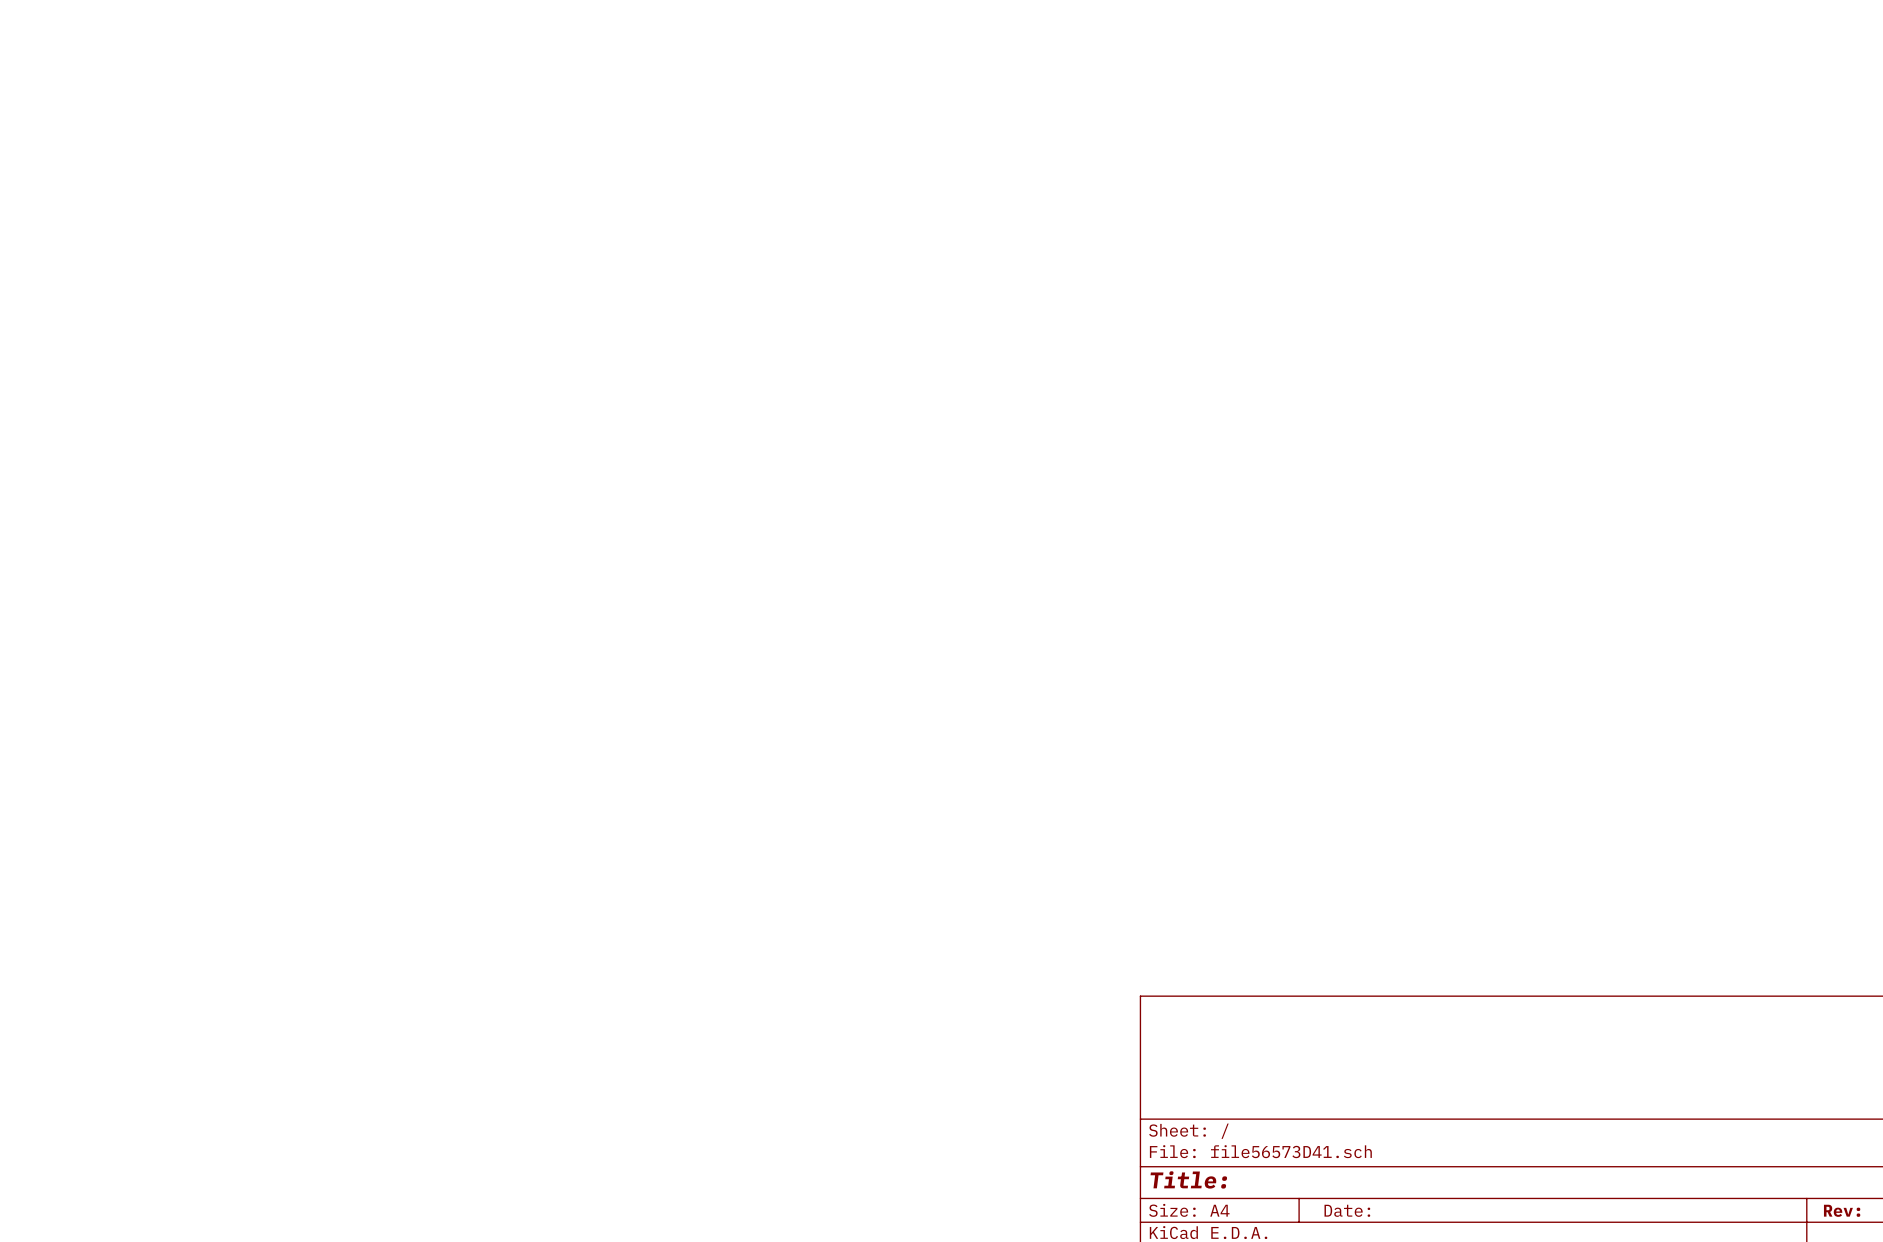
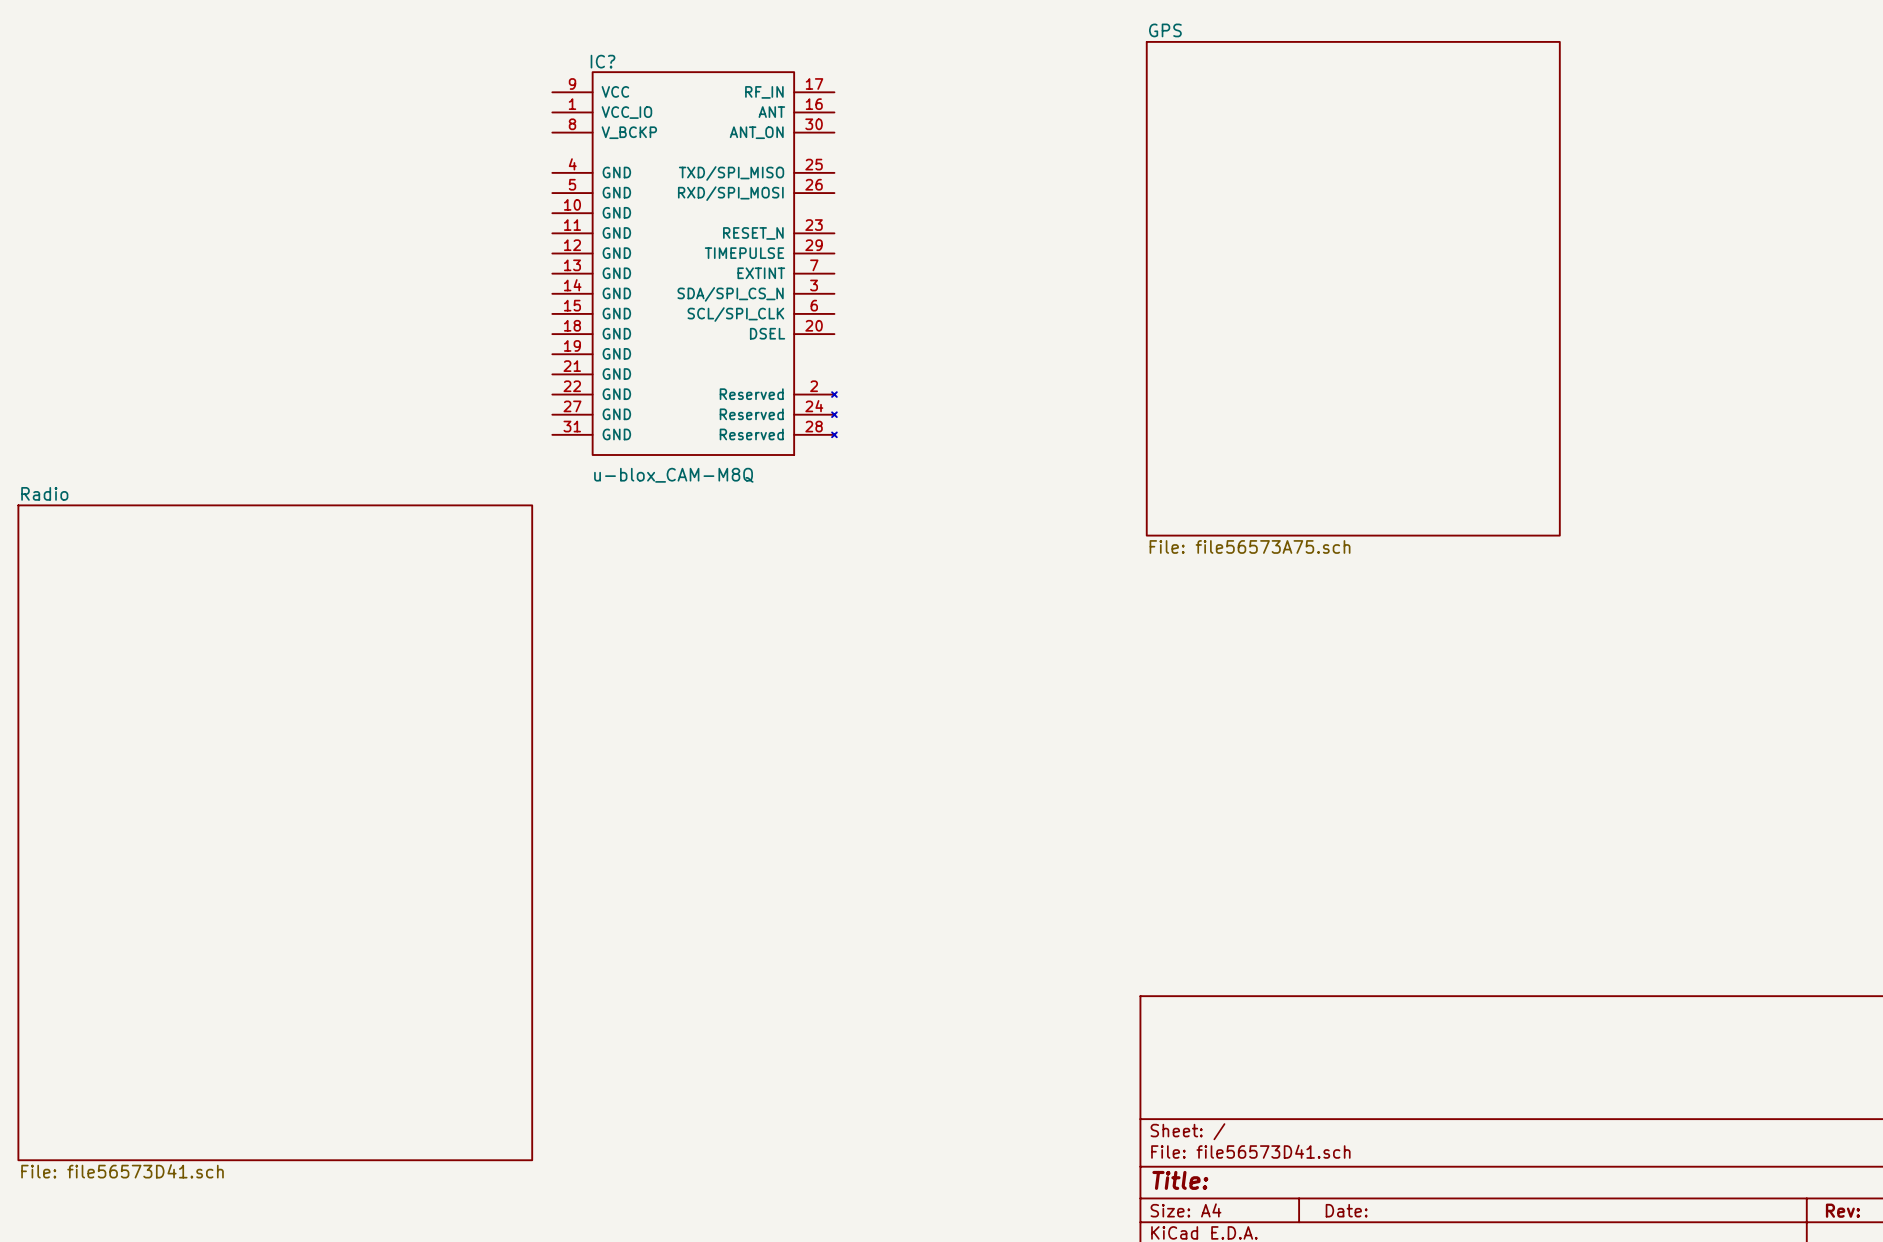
IC?: none -> u-blox_CAM-M8Q (694, 263)
sheet GPS: none -> File: file56573A75.sch (1353, 288)
sheet Radio: none -> File: file56573D41.sch (275, 832)

